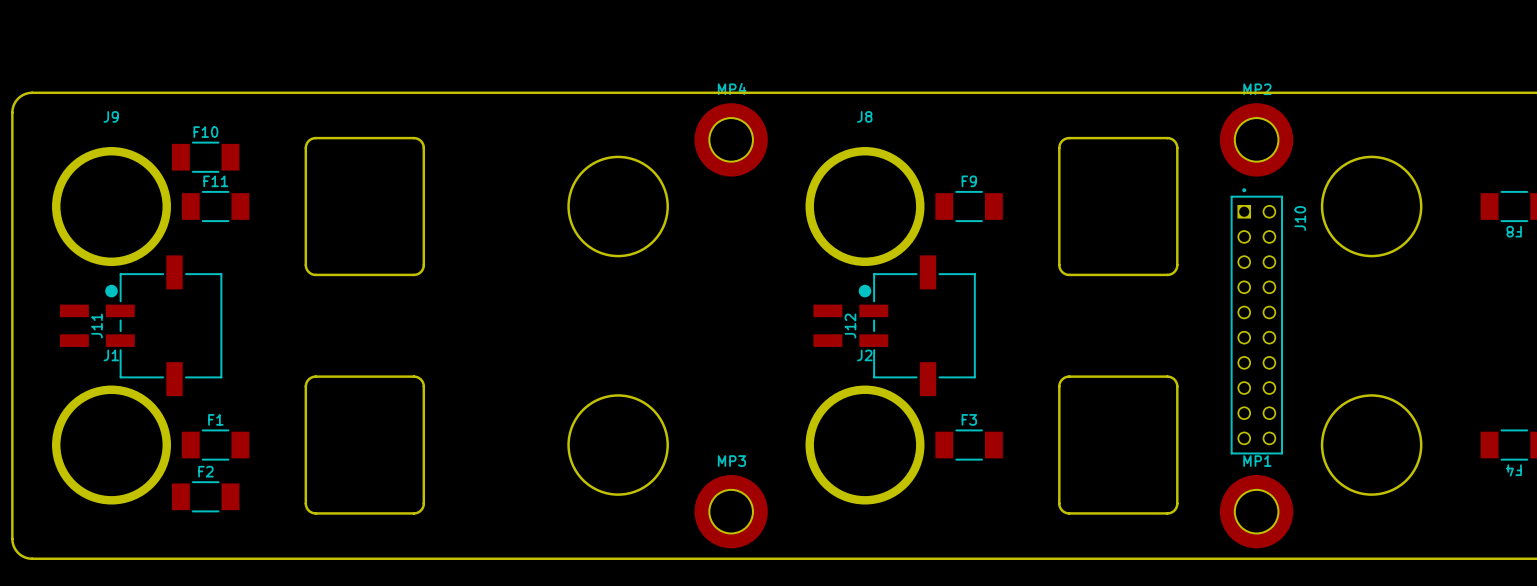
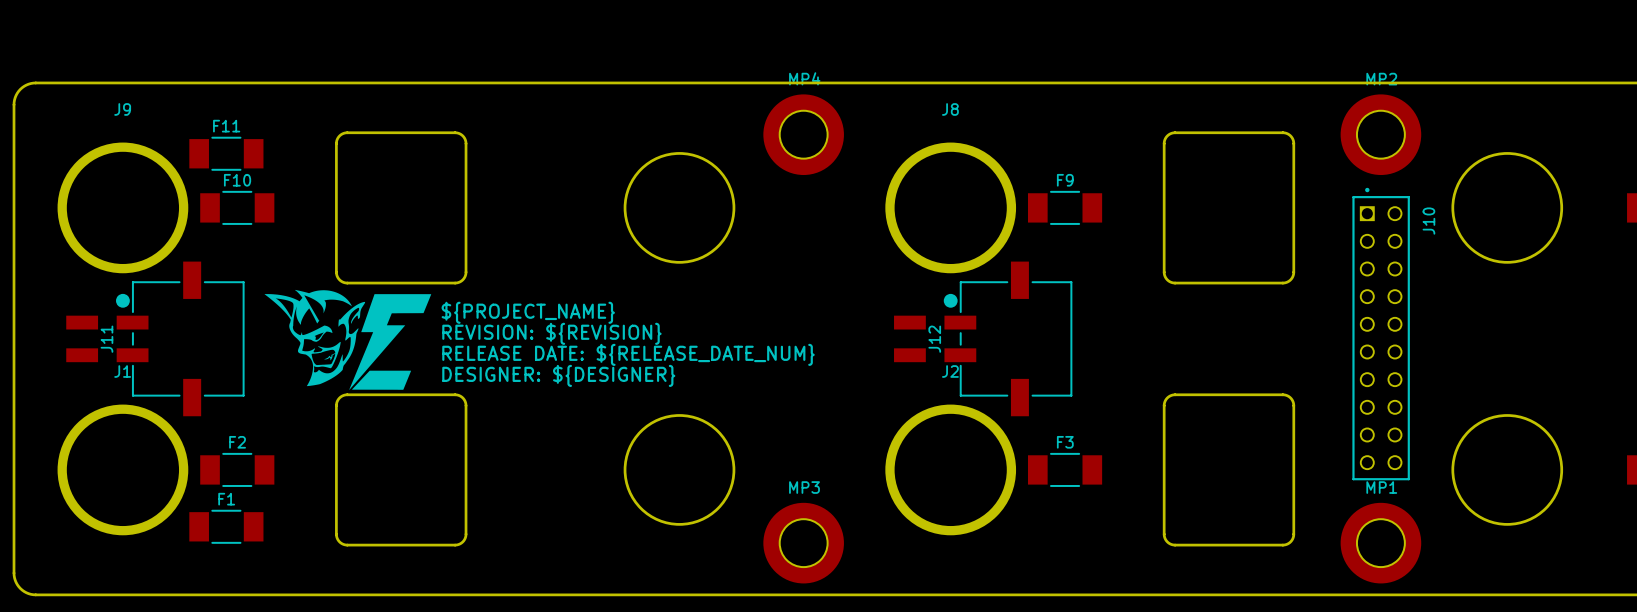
F10 name: F10 (205, 132) -> F11 (226, 126)
F11 name: F11 (215, 181) -> F10 (237, 180)
drawing: none -> [264, 289, 432, 390]
text: none -> ${PROJECT_NAME} (528, 312)
text: none -> REVISION: ${REVISION} (551, 333)
text: none -> RELEASE DATE: ${RELEASE_DATE_NUM} (628, 354)
text: none -> DESIGNER: ${DESIGNER} (558, 375)
F1 name: F1 (215, 419) -> F2 (237, 442)
F2 name: F2 (205, 471) -> F1 (226, 499)

